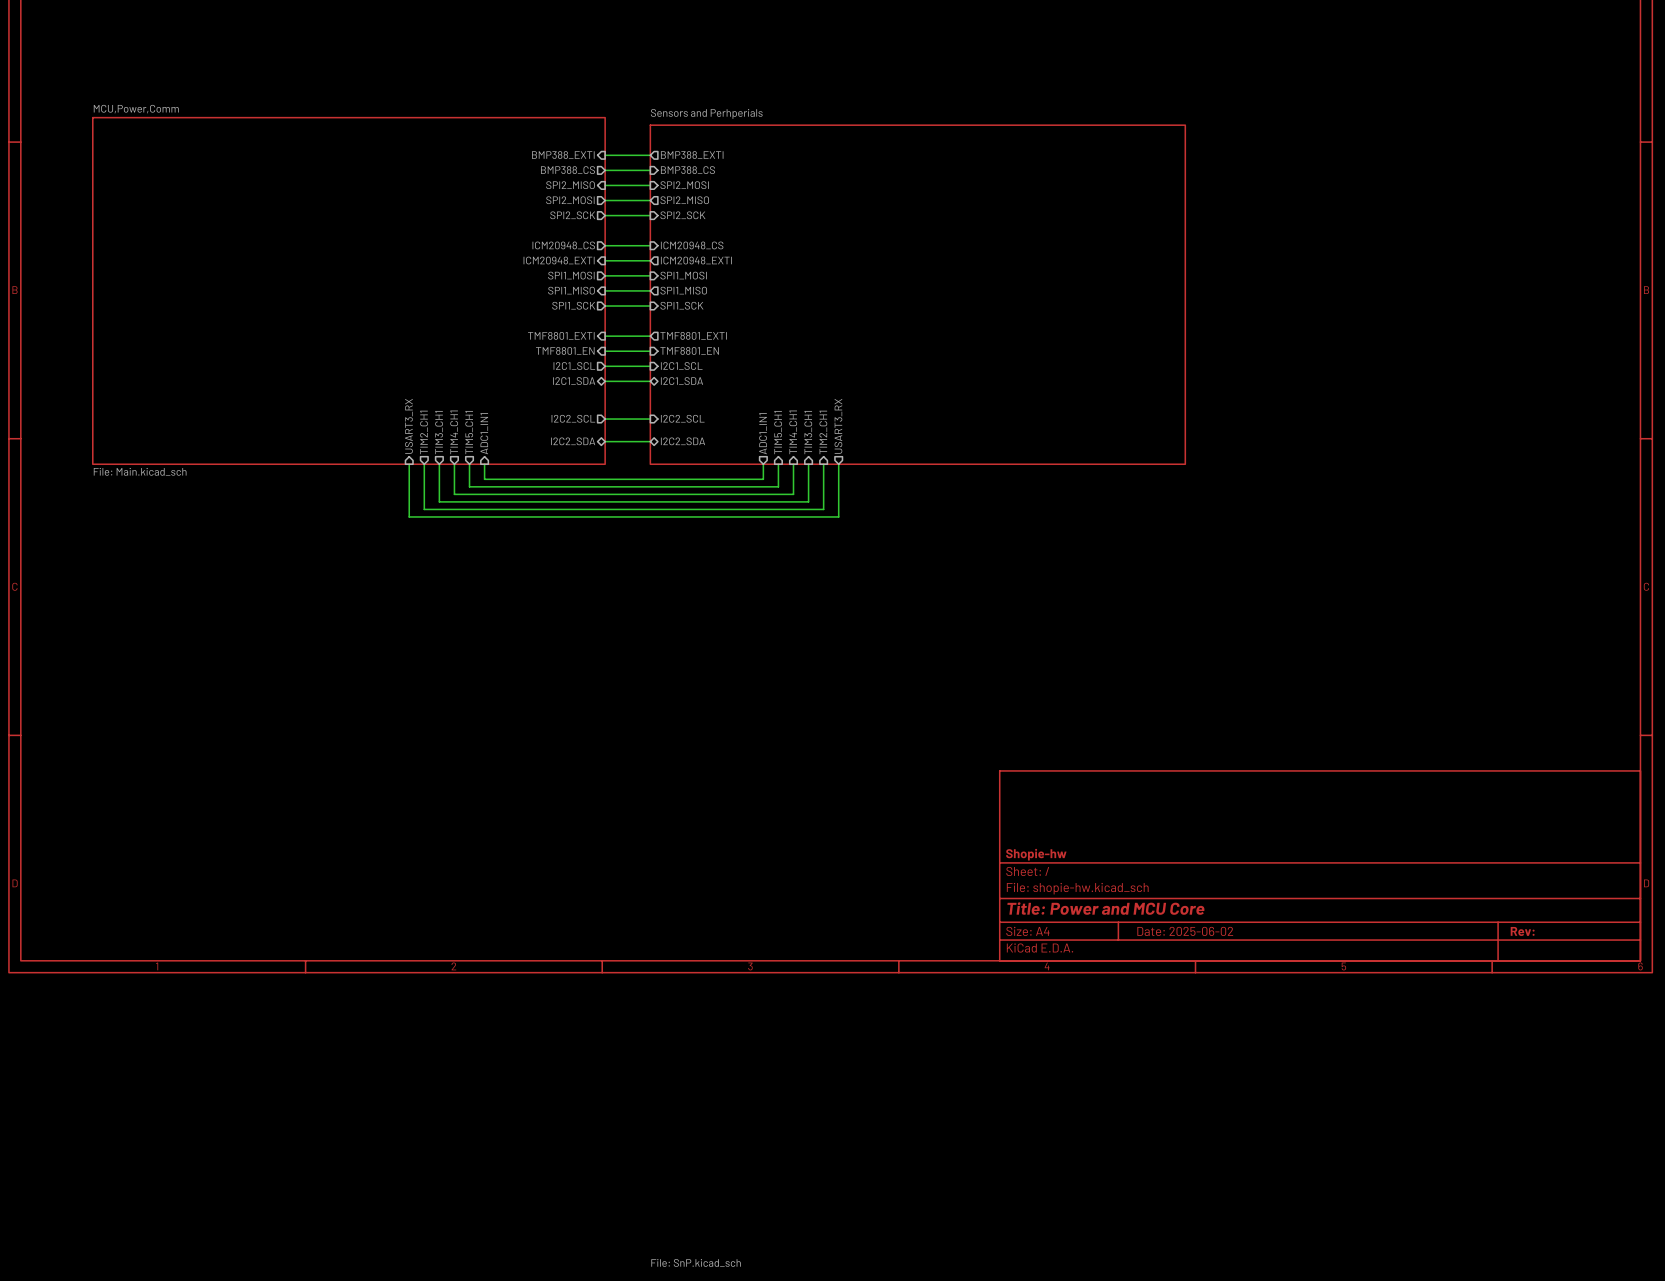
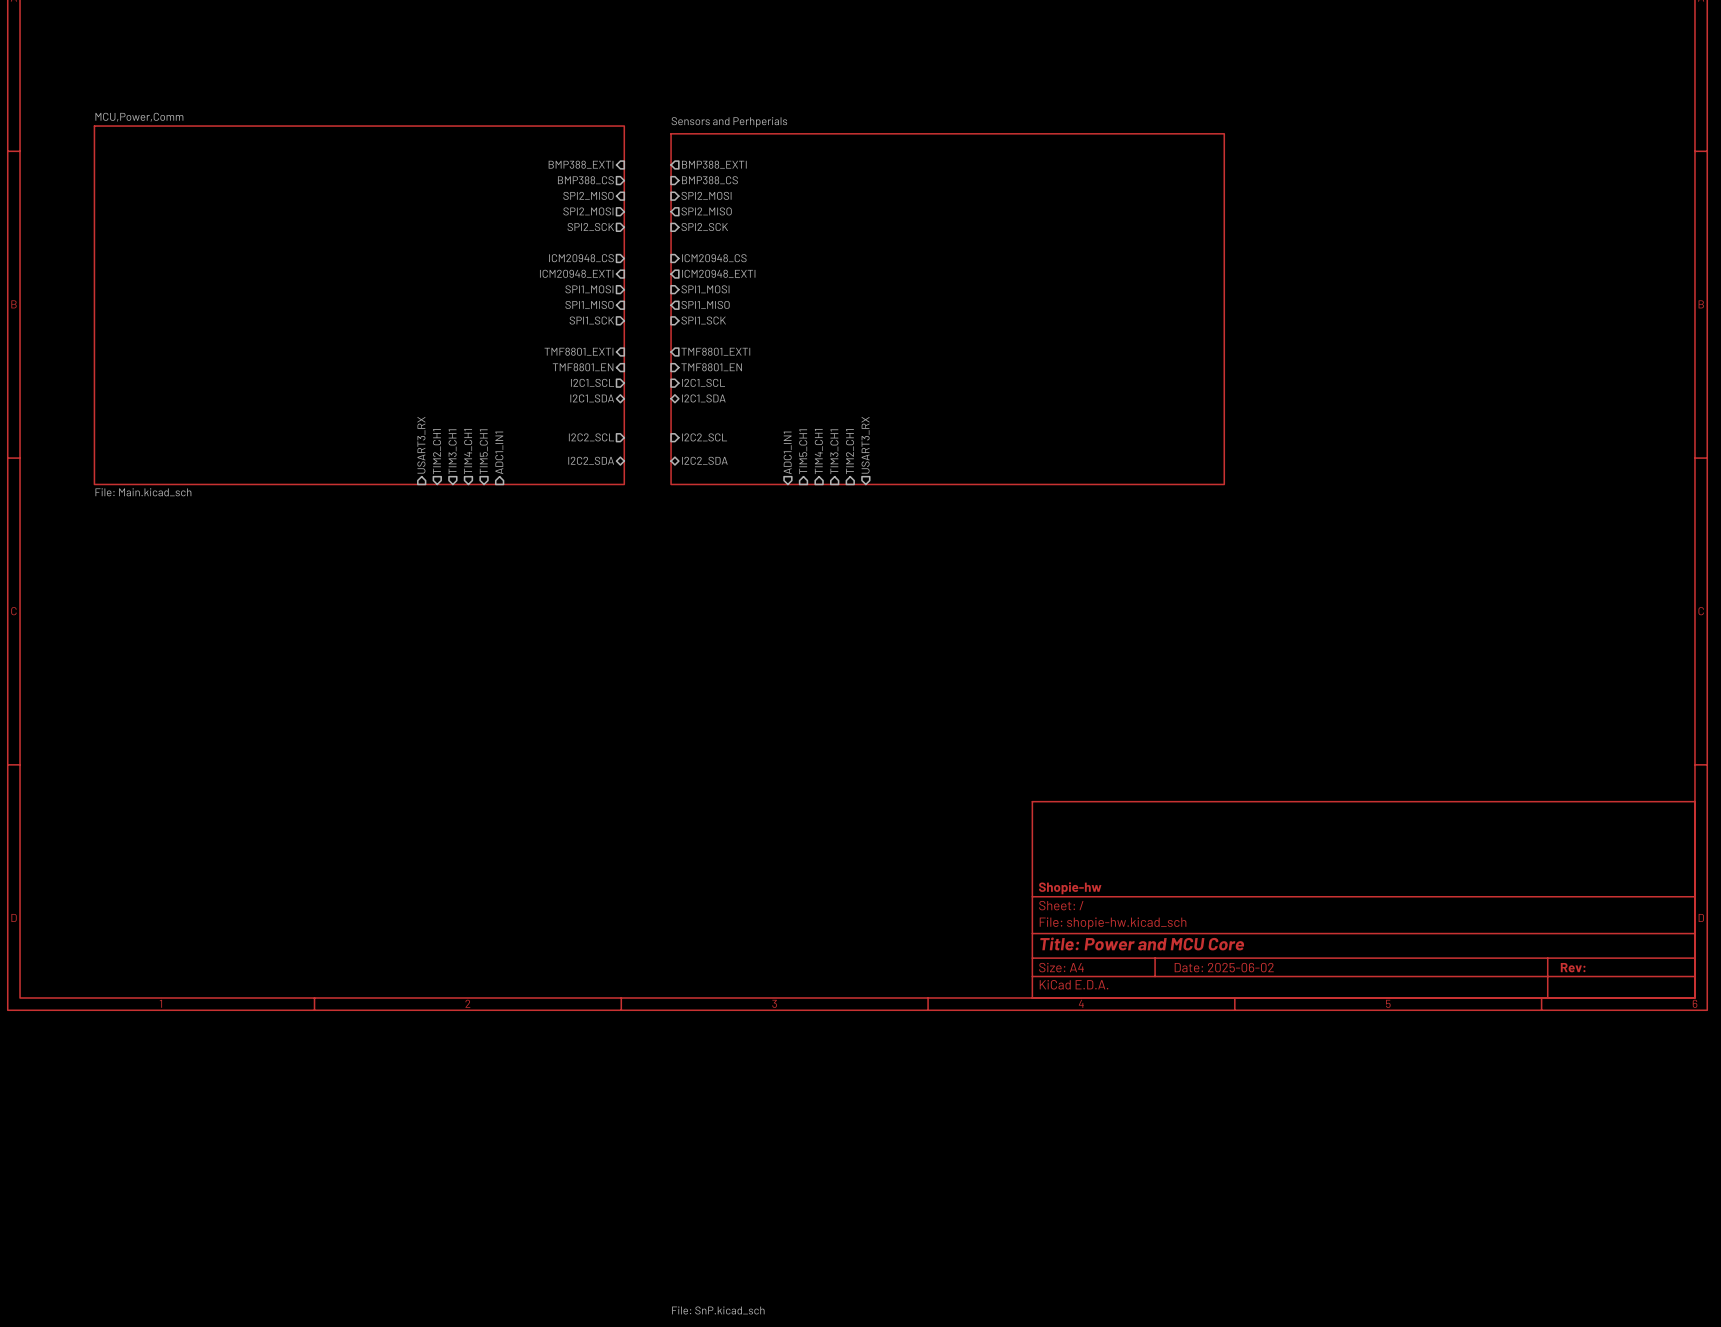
wire: (605, 155) (650, 155) -> none
wire: (605, 170) (650, 170) -> none
wire: (605, 185) (650, 185) -> none
wire: (605, 200) (650, 200) -> none
wire: (605, 215) (650, 215) -> none
wire: (605, 245) (650, 245) -> none
wire: (605, 260) (650, 260) -> none
wire: (605, 275) (650, 275) -> none
wire: (605, 290) (650, 290) -> none
wire: (605, 306) (650, 306) -> none
wire: (605, 336) (650, 336) -> none
wire: (605, 351) (650, 351) -> none
wire: (605, 366) (650, 366) -> none
wire: (605, 381) (650, 381) -> none
wire: (605, 419) (650, 419) -> none
wire: (605, 441) (650, 441) -> none
wire: (409, 464) (409, 516) (838, 516) (838, 464) -> none
wire: (424, 464) (424, 509) (823, 509) (823, 464) -> none
wire: (439, 464) (439, 501) (808, 501) (808, 464) -> none
wire: (454, 464) (454, 494) (793, 494) (793, 464) -> none
wire: (469, 464) (469, 486) (778, 486) (778, 464) -> none
wire: (484, 464) (484, 479) (763, 479) (763, 464) -> none

